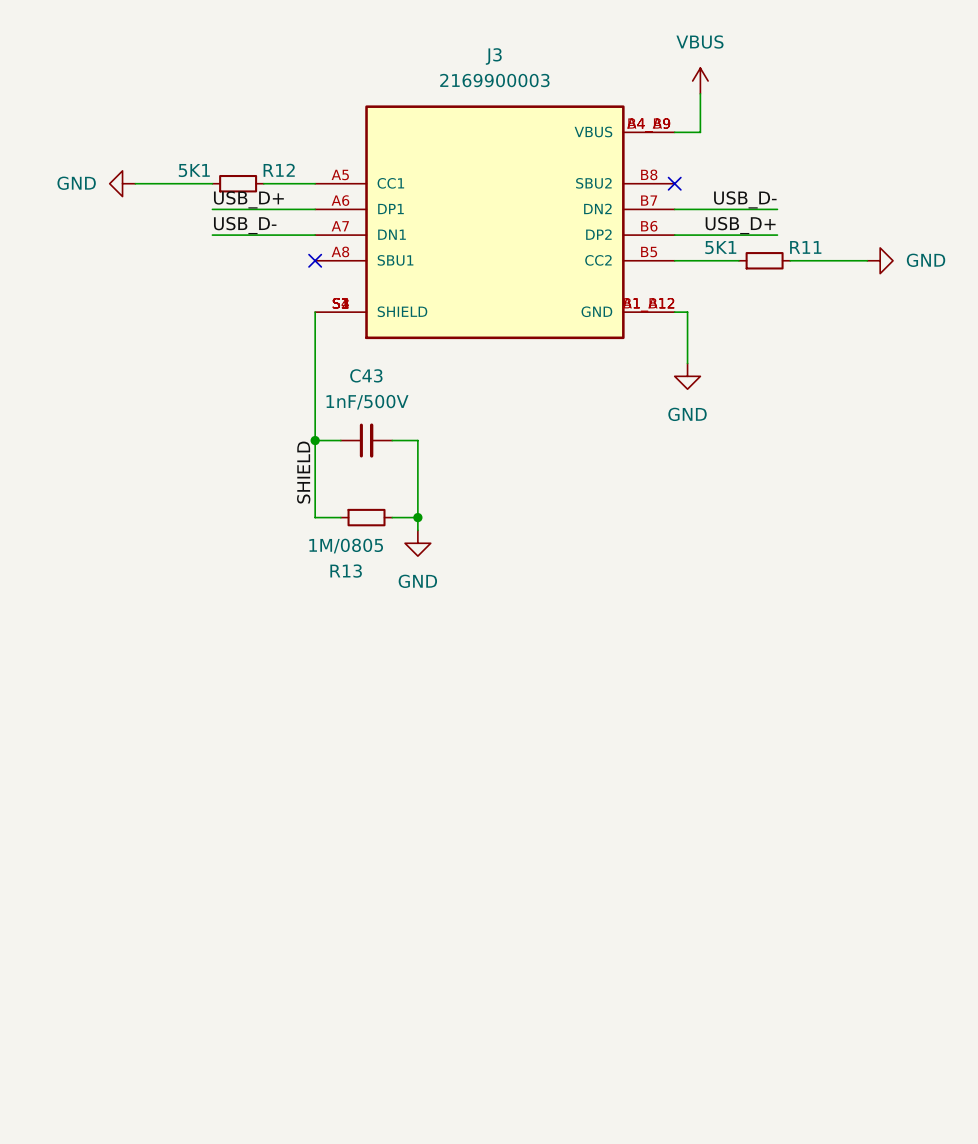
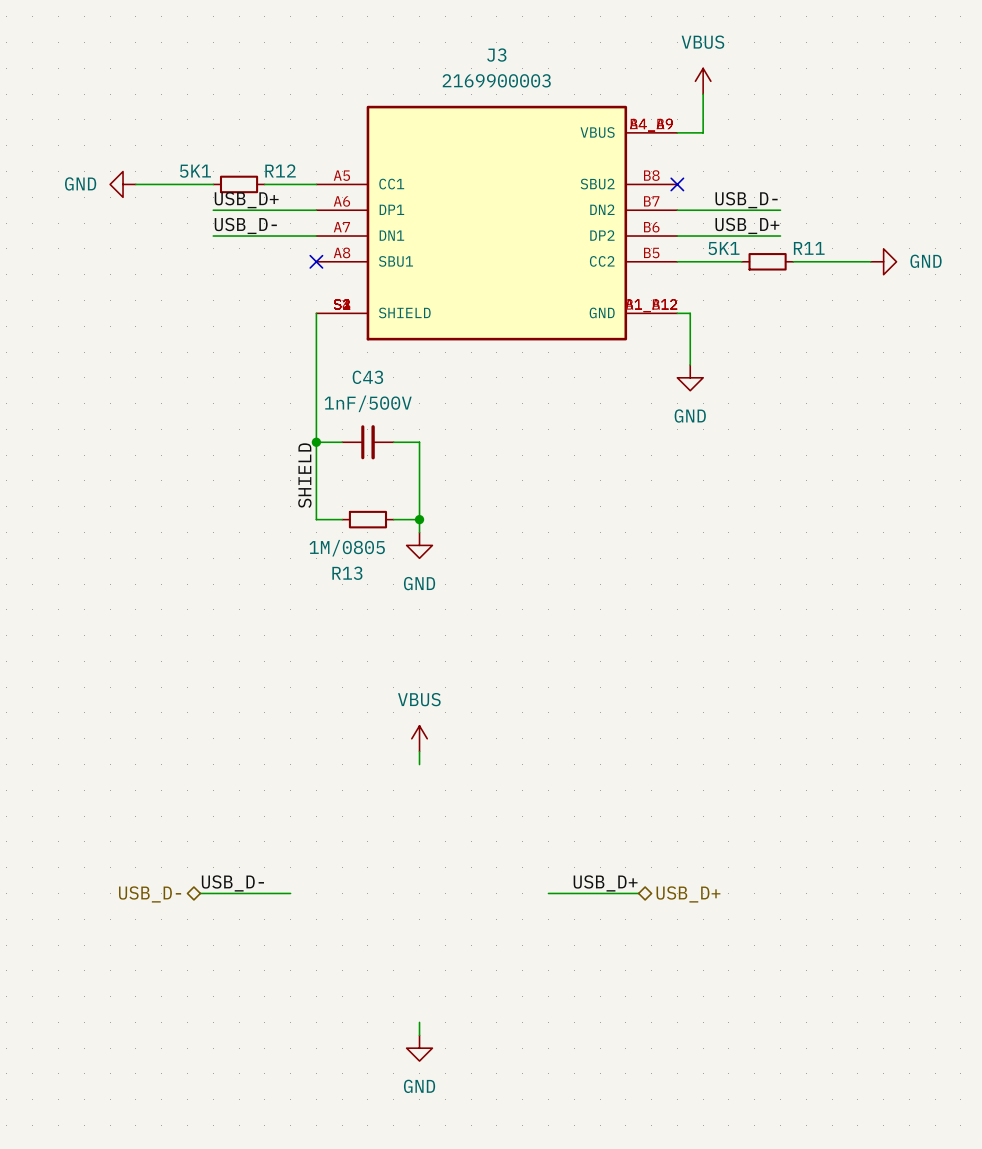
power symbol: none -> VBUS (419, 738)
wire: none -> (419, 751) (419, 764)
label: none -> USB_D- (232, 883)
label: none -> USB_D+ (605, 883)
wire: none -> (200, 893) (290, 893)
wire: none -> (548, 893) (638, 893)
hierarchical label: none -> USB_D- (150, 894)
hierarchical label: none -> USB_D+ (688, 894)
wire: none -> (419, 1022) (419, 1035)
power symbol: none -> GND (419, 1048)

